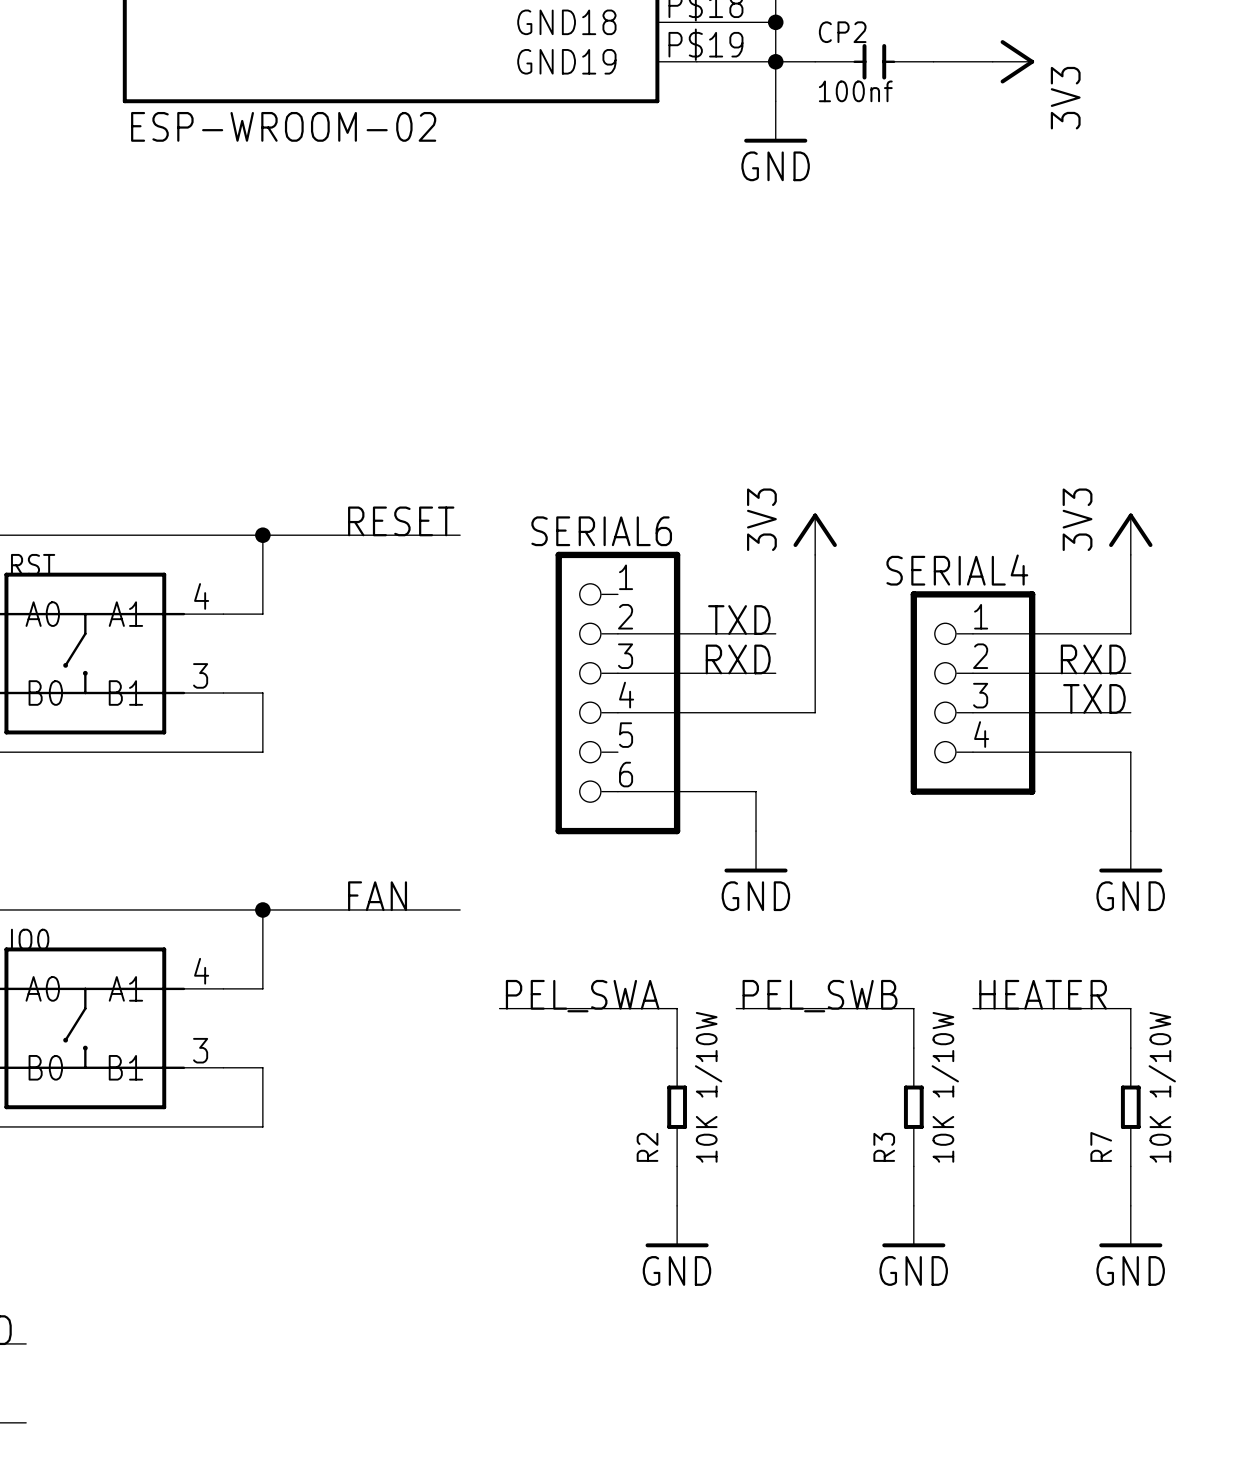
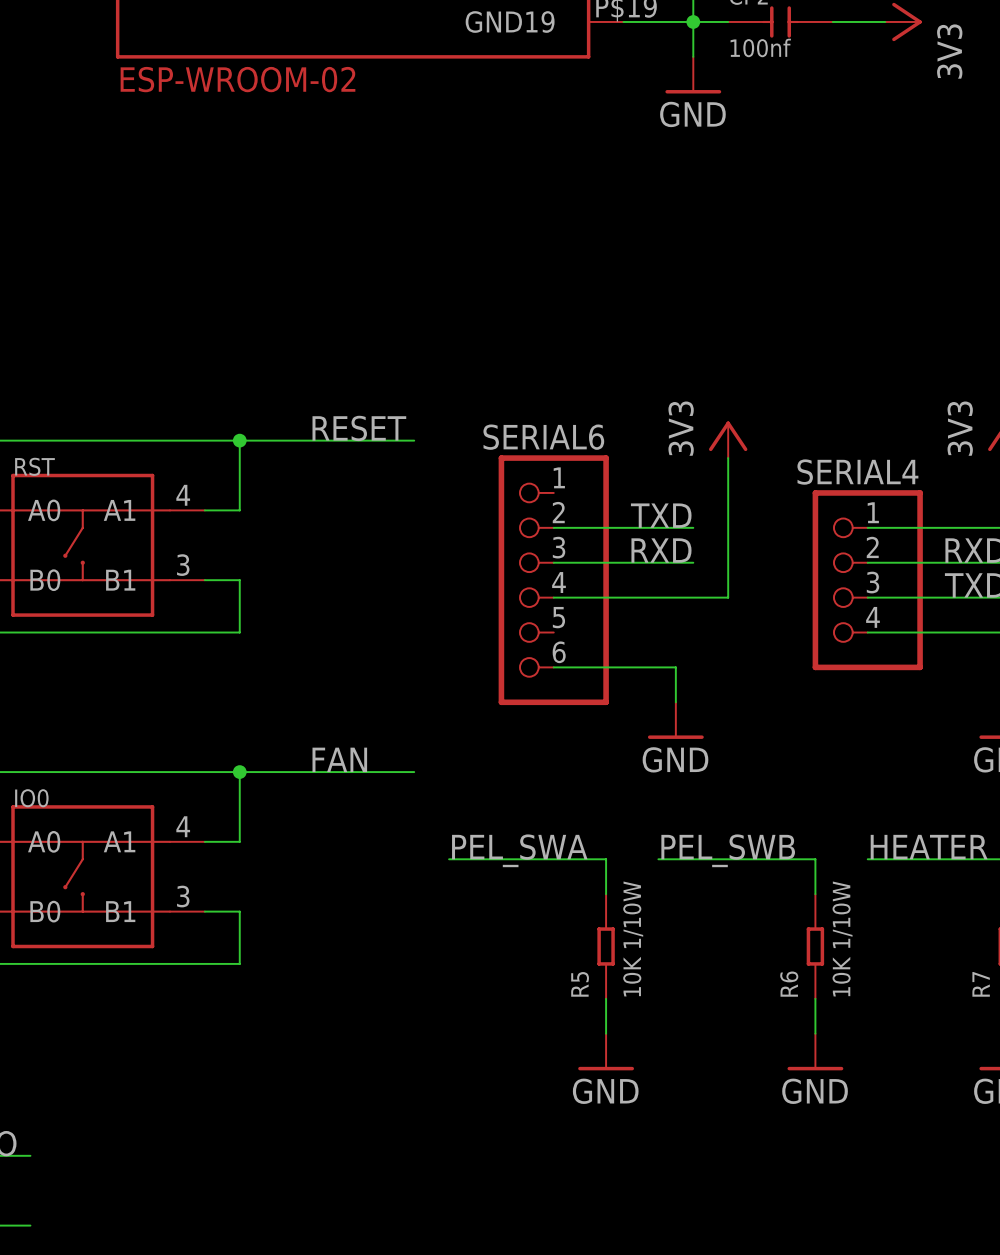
R2 name: R2 (647, 1147) -> R5 (580, 984)
R3 name: R3 (884, 1147) -> R6 (789, 984)

